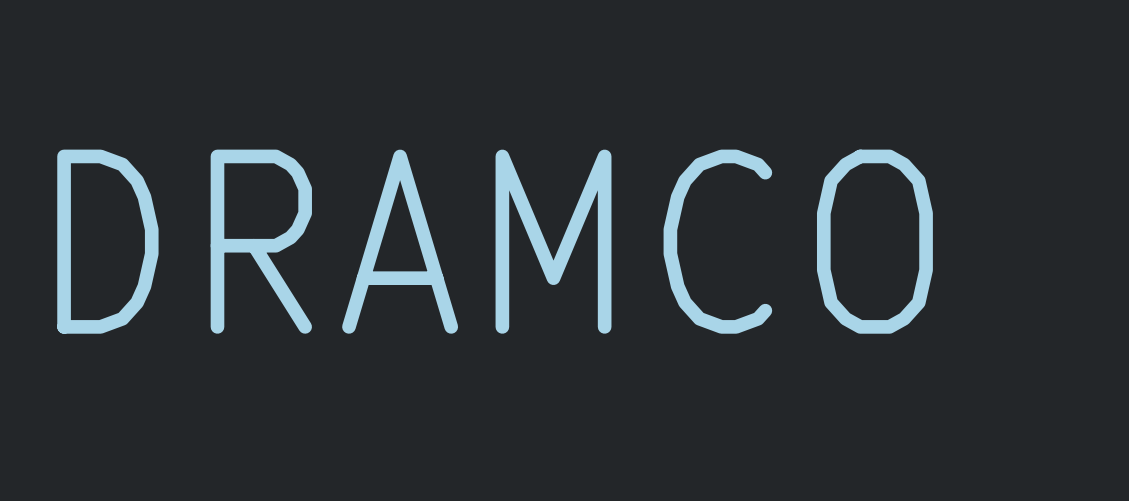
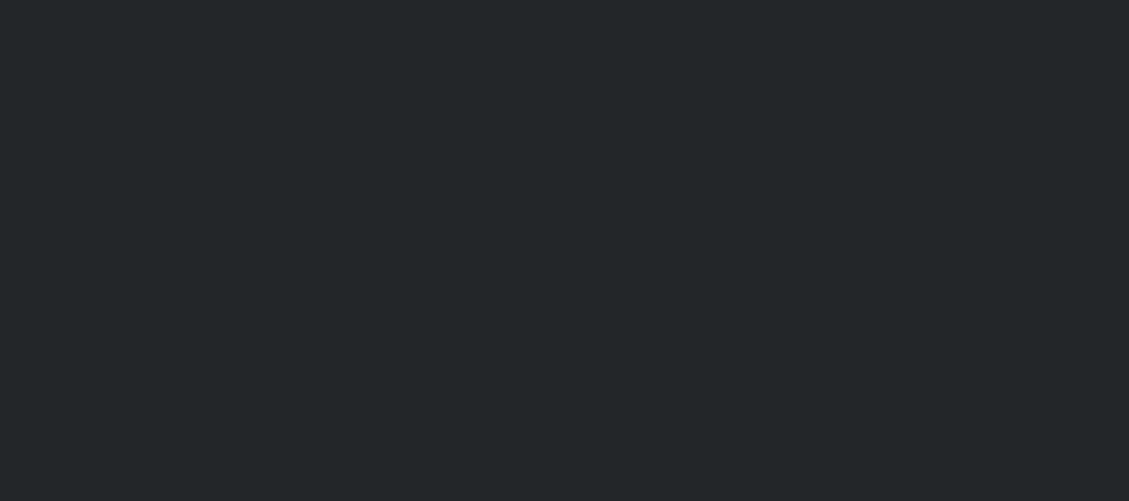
text: DRAMCO (495, 241) -> none

